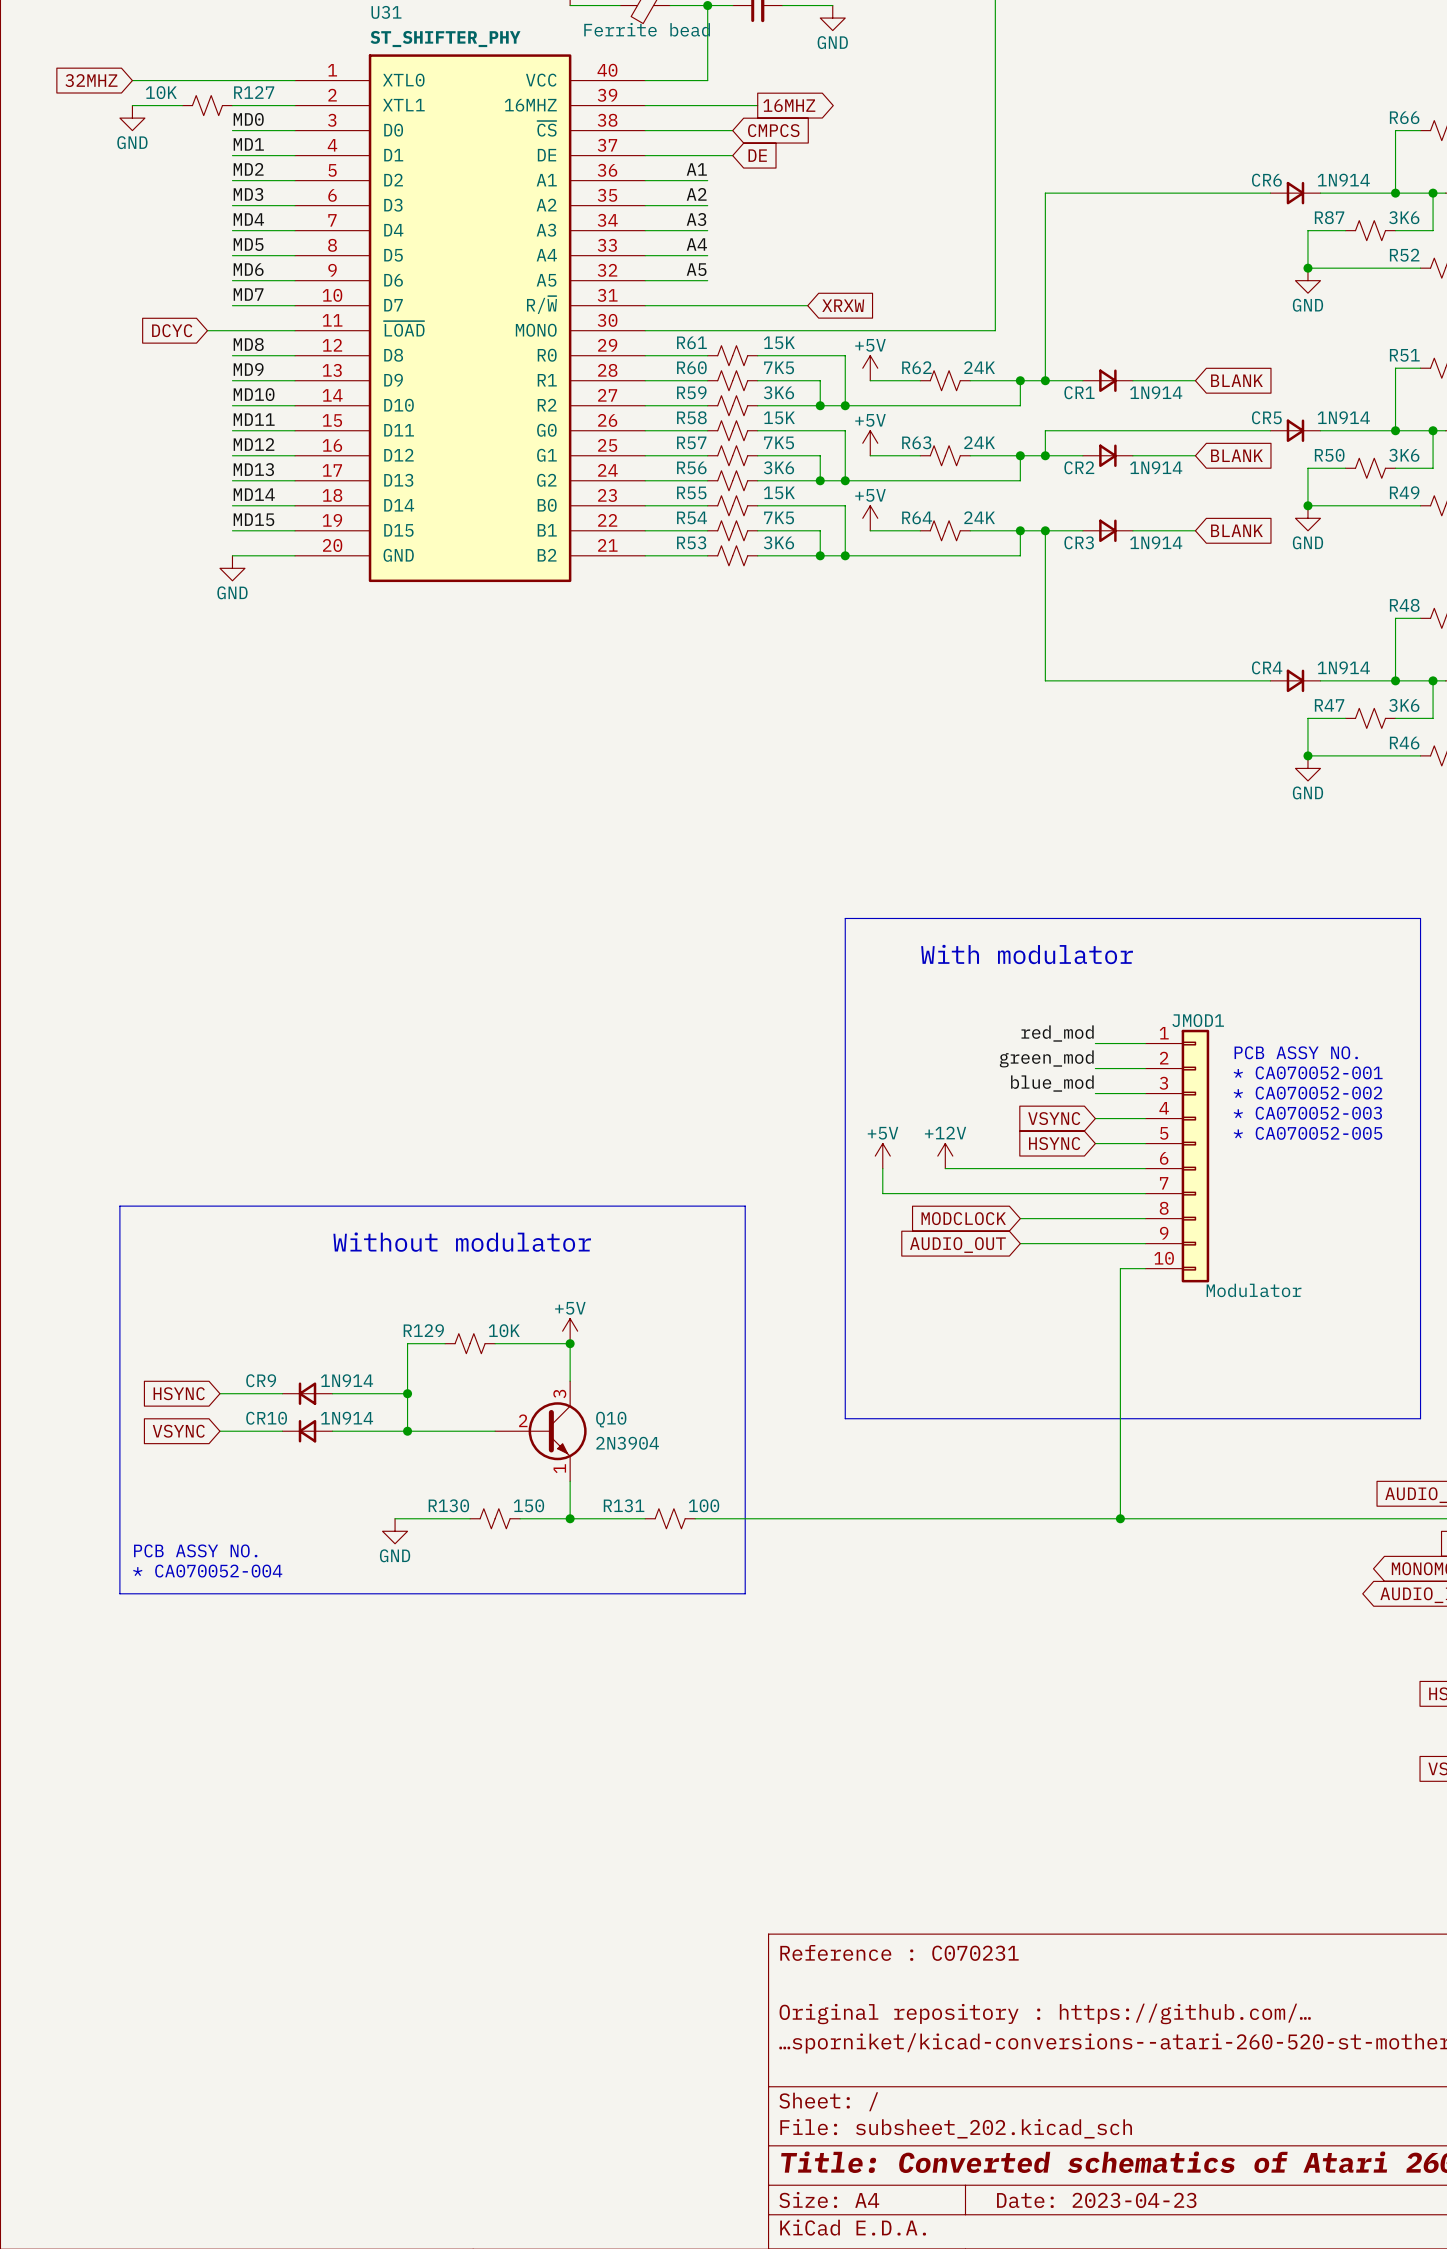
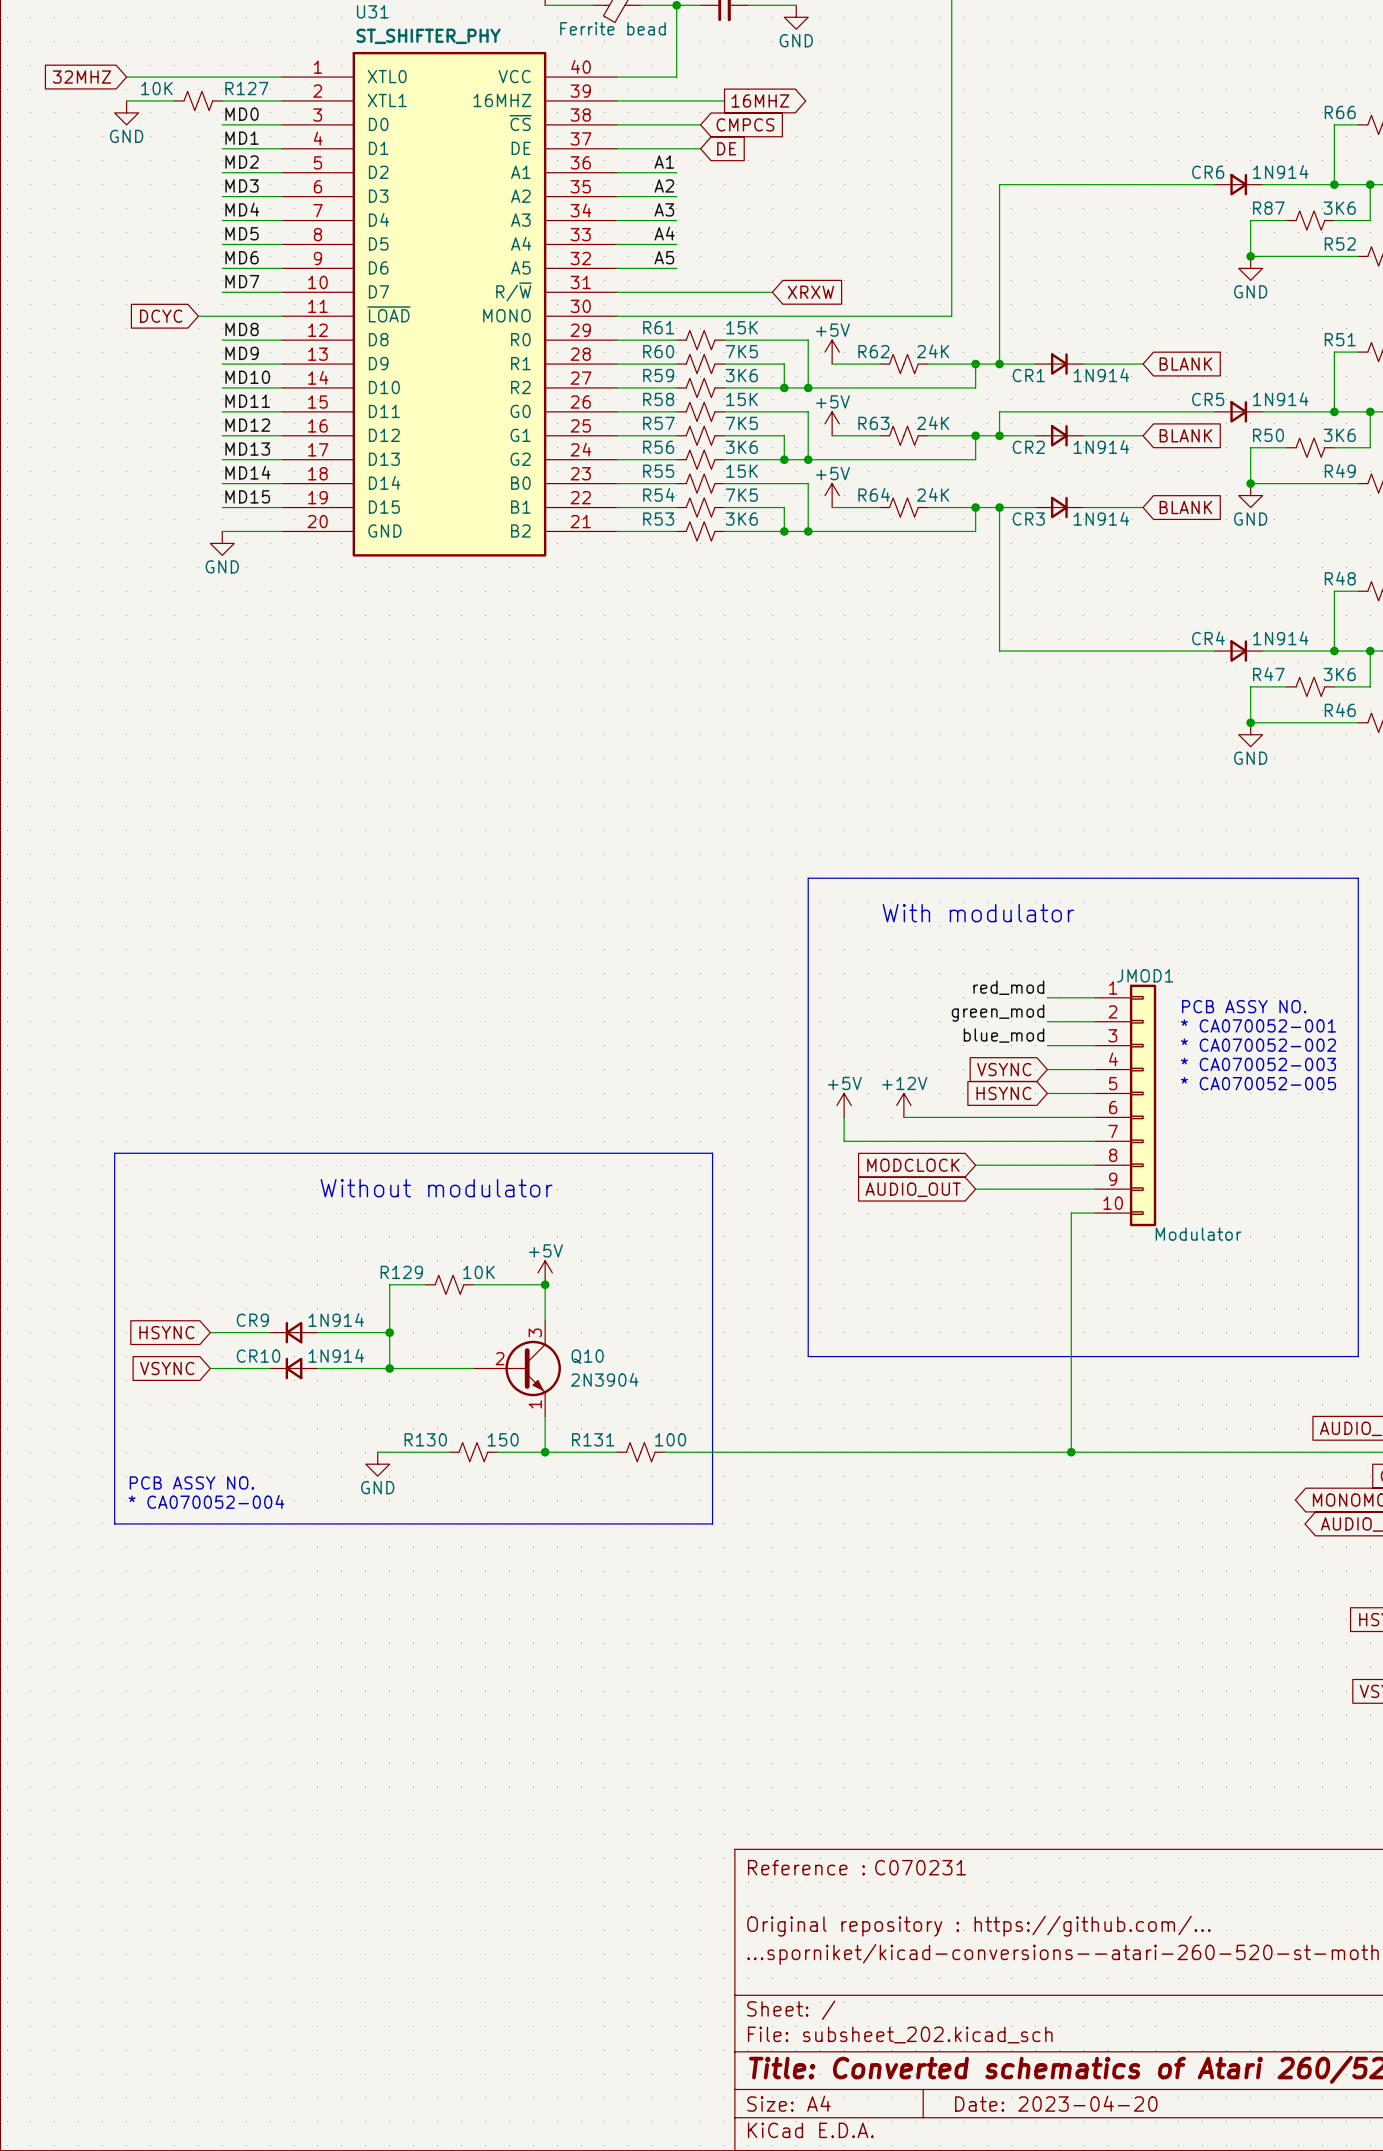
title block: Date: 2023-04-23 (1096, 2200) -> Date: 2023-04-20 (1056, 2103)

